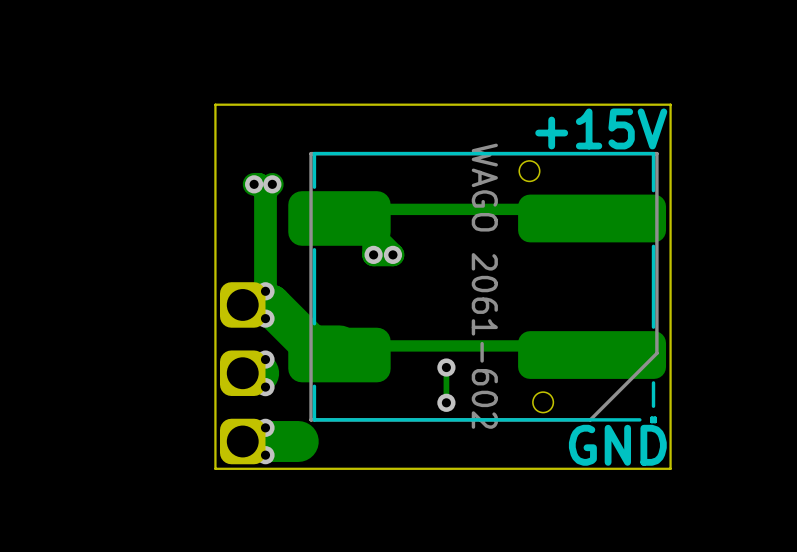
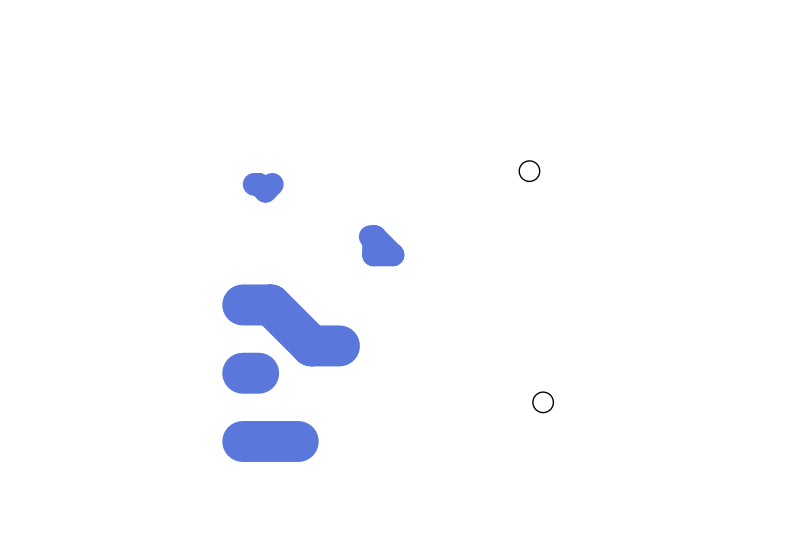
board edge: (670, 104) (215, 104) (215, 468) (670, 468) (670, 104) -> none
text: +15V (601, 128) -> none
via: (254, 184) -> none
via: (272, 184) -> none
track: (265, 191) (265, 301) -> none
track: (338, 209) (590, 209) (600, 219) -> none
via: (373, 254) -> none
via: (392, 254) -> none
part: WAGO 2061-602 (477, 287) -> none
via: (265, 291) -> none
via: (265, 318) -> none
track: (590, 345) (534, 345) (533, 347) (531, 345) (338, 345) -> none
via: (265, 359) -> none
track: (446, 367) (446, 402) -> none
via: (446, 367) -> none
part: (242, 373) -> none
via: (265, 387) -> none
via: (446, 402) -> none
via: (265, 427) -> none
text: GND (617, 445) -> none
via: (265, 455) -> none

